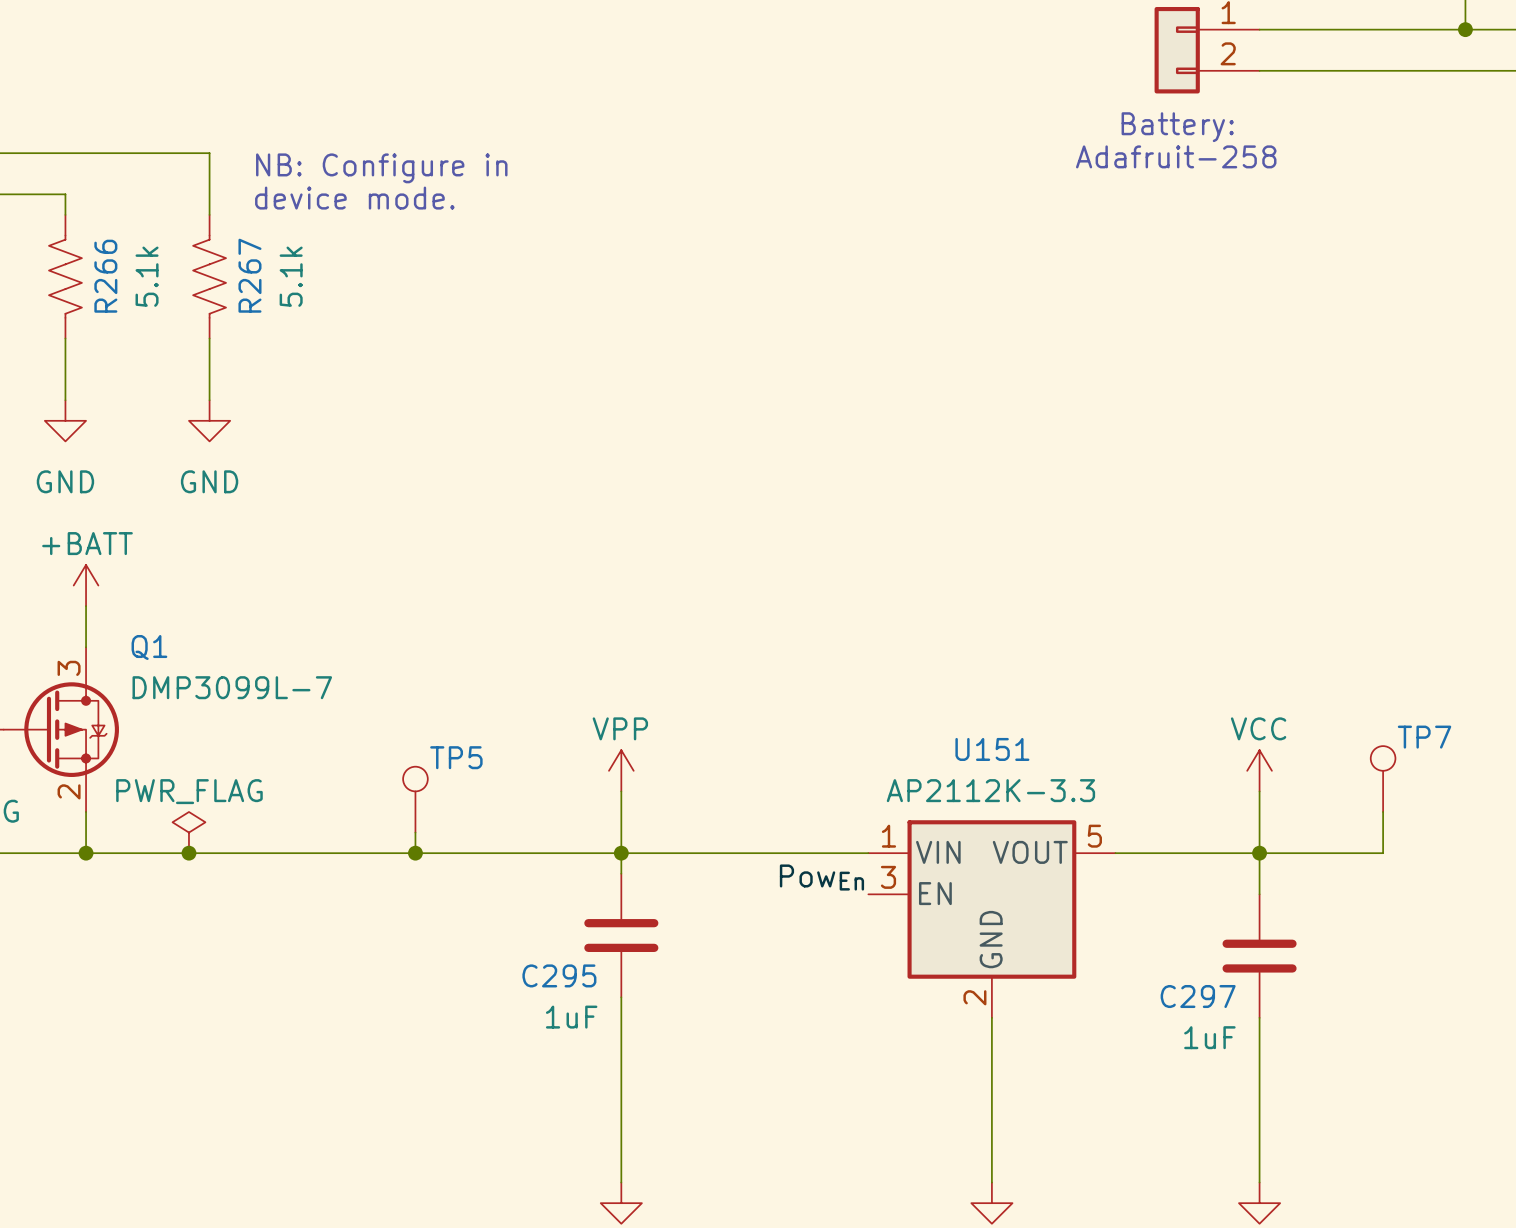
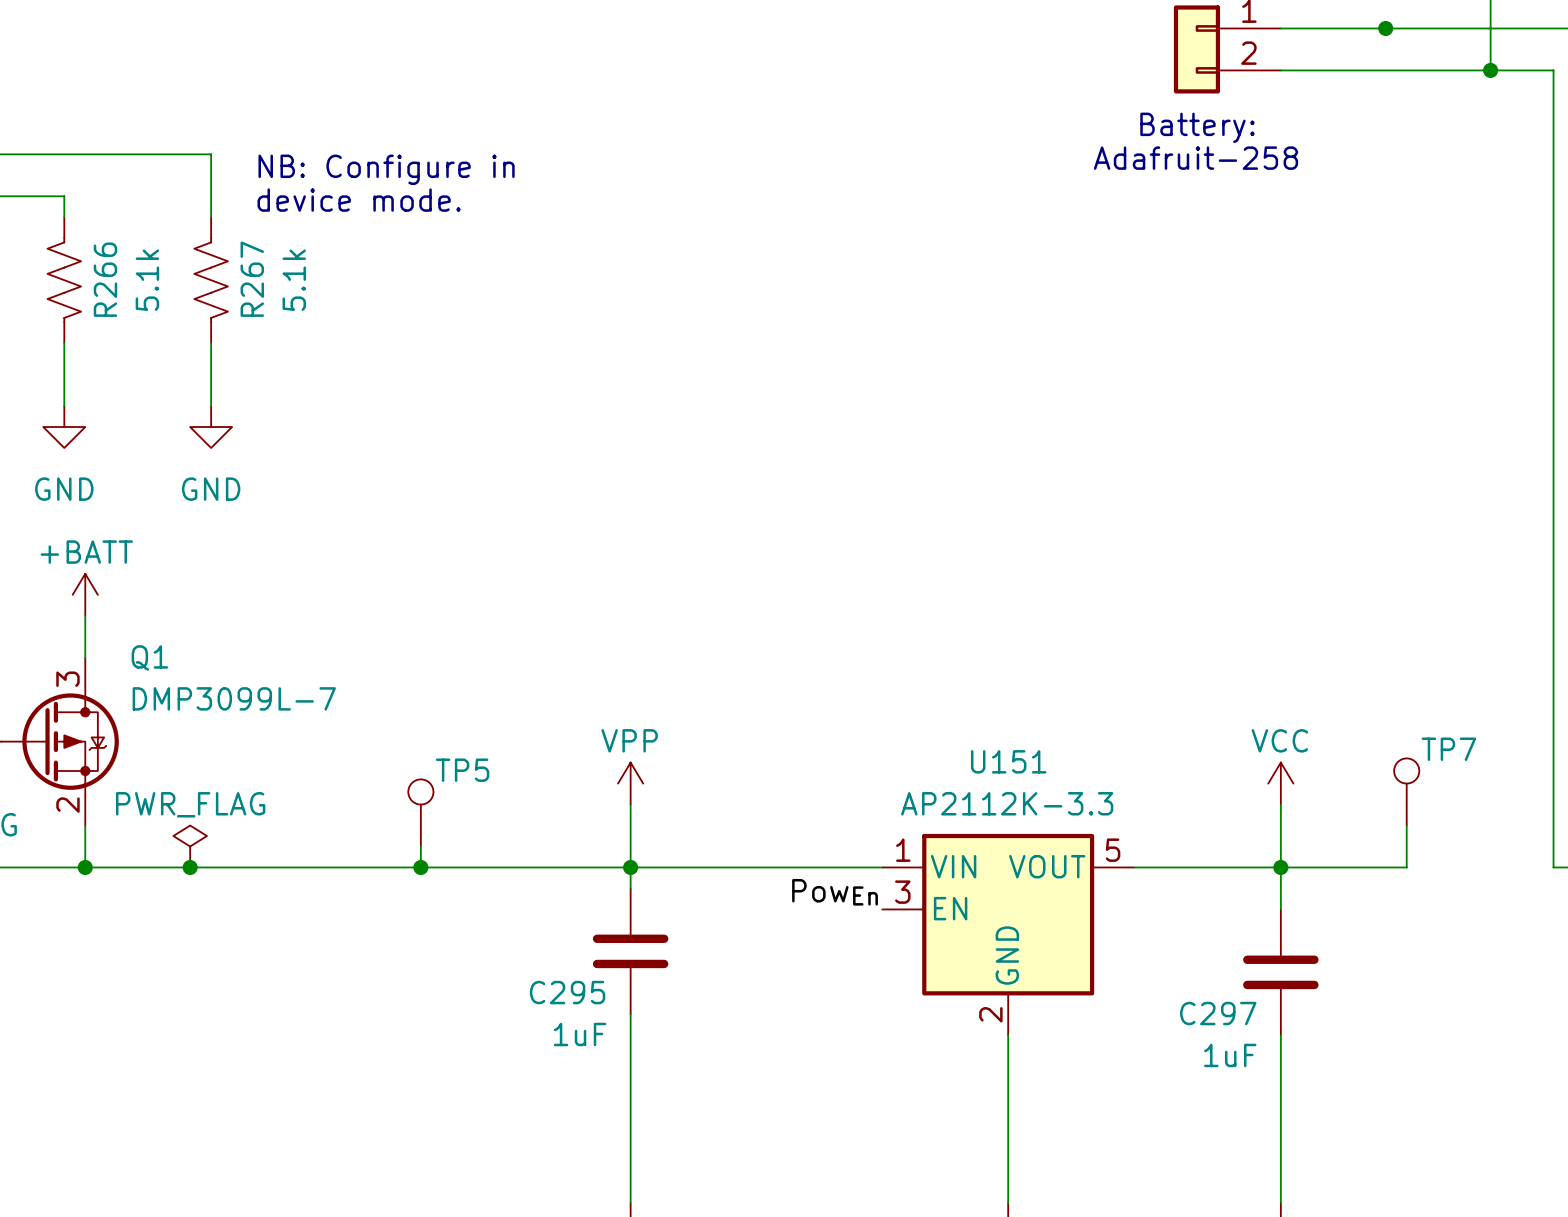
junction: none -> (1385, 28)
wire: none -> (1490, 28) (1490, 70)
junction position: (1465, 29) -> (1490, 70)

